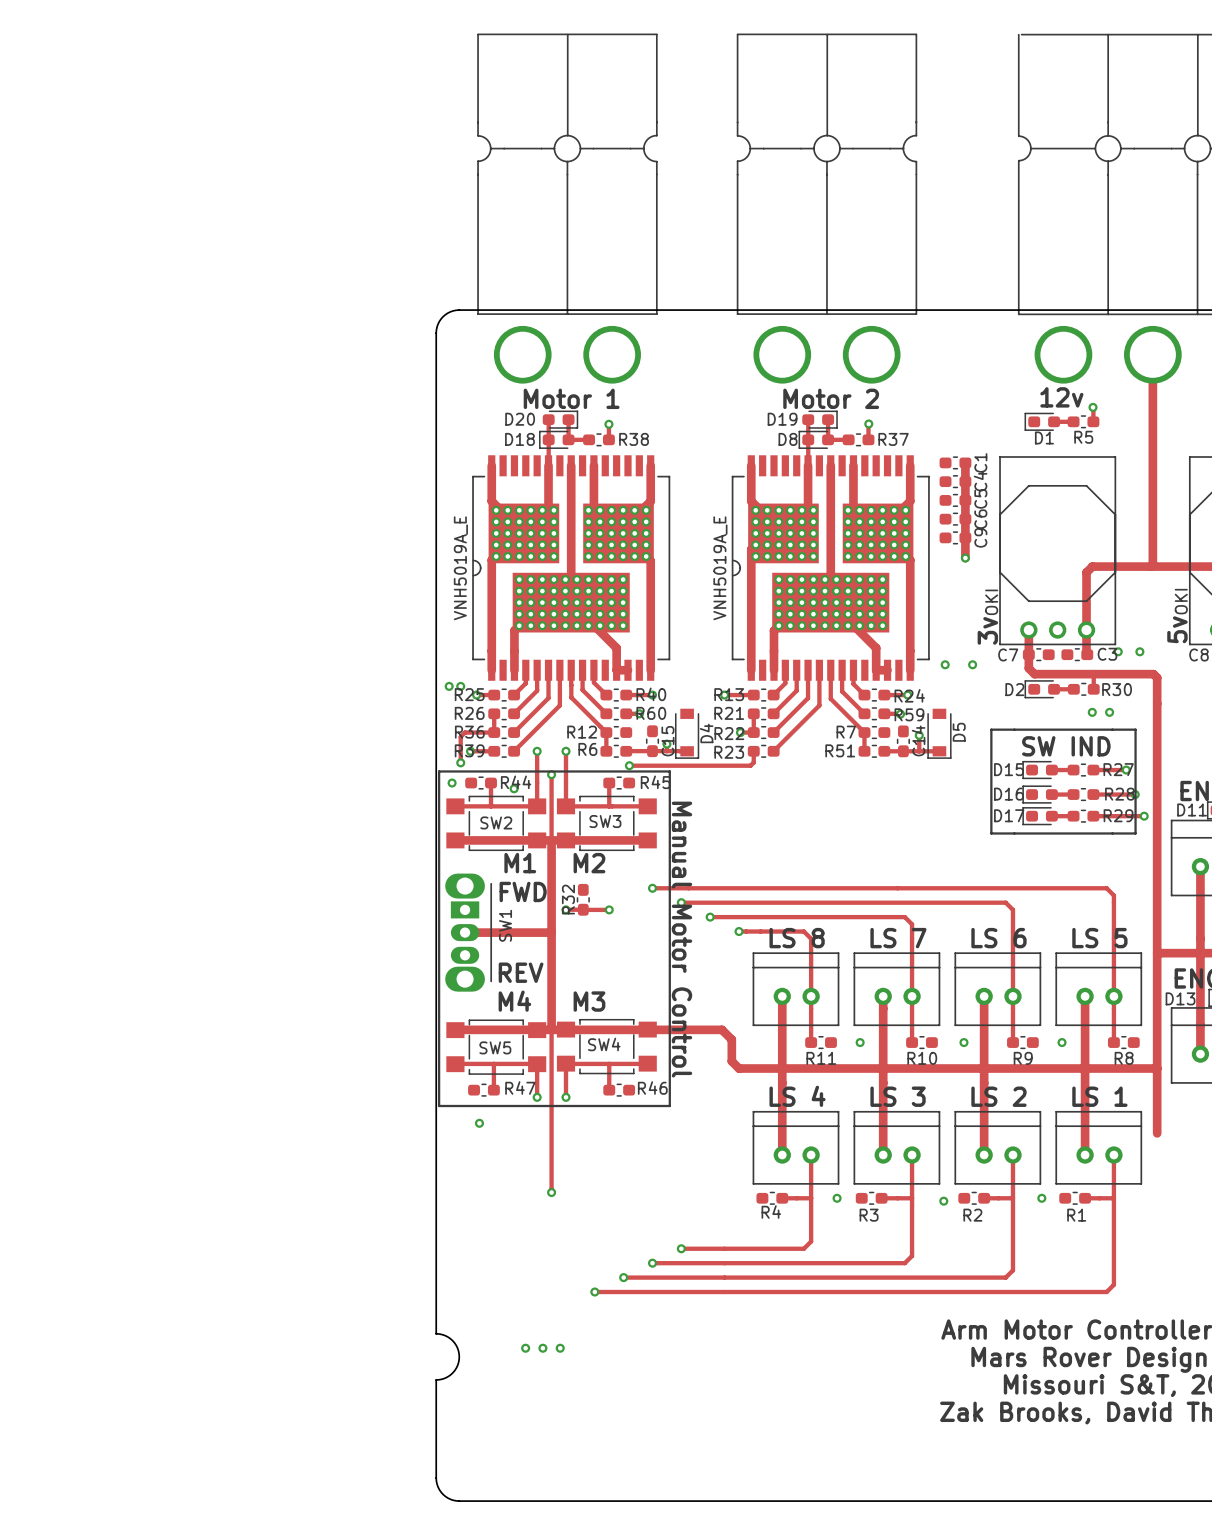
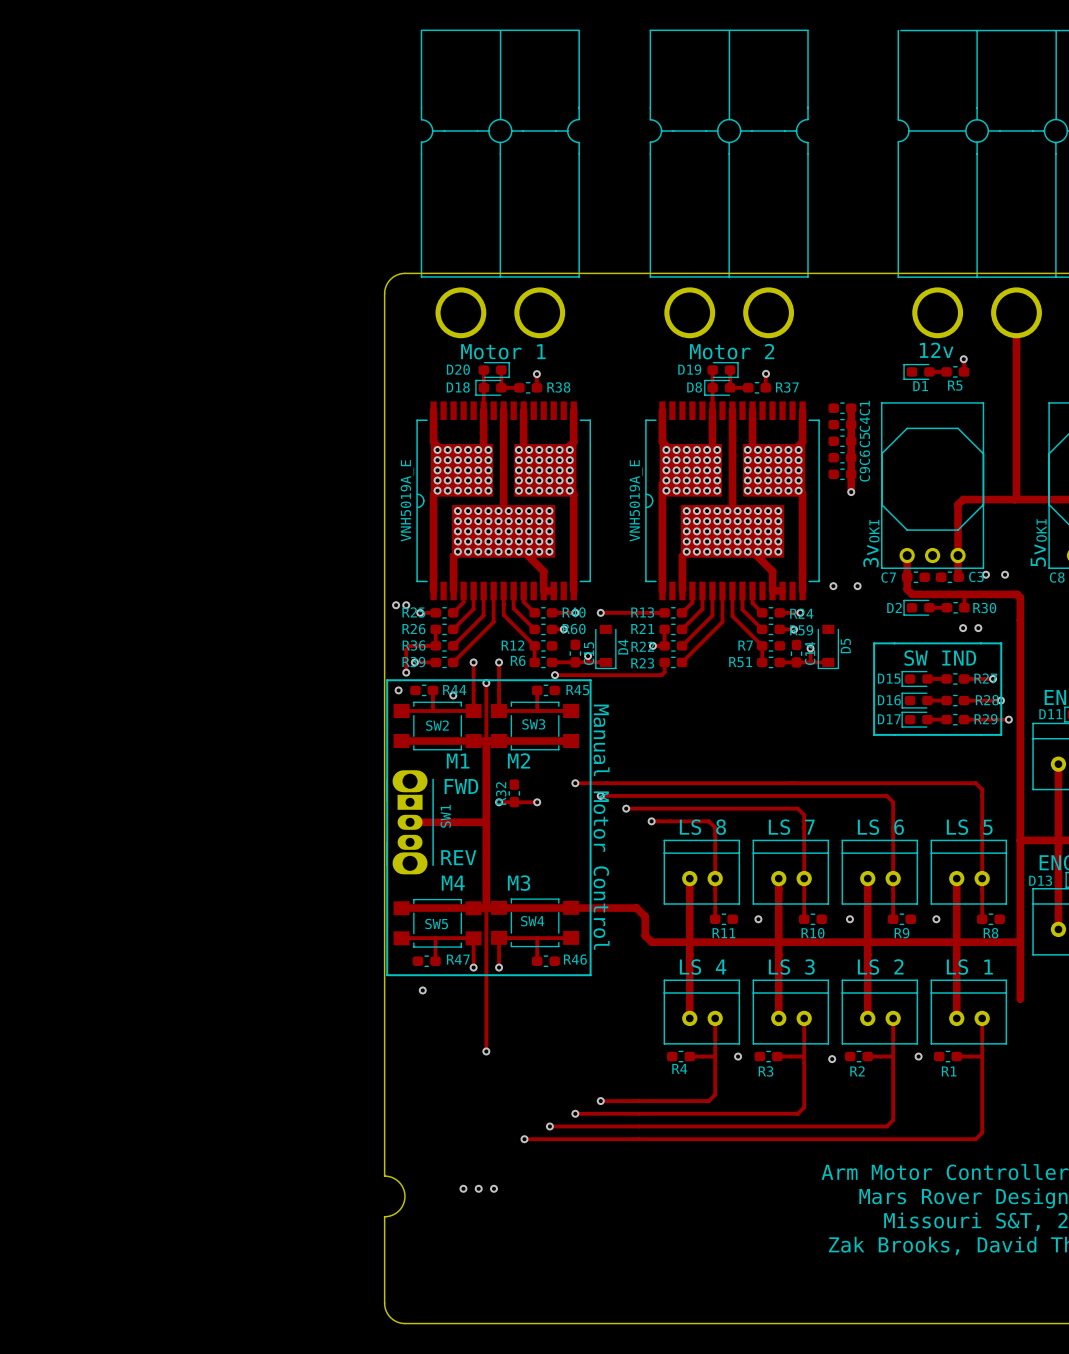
track: none -> (600, 612) (638, 612)
via position: (724, 695) -> (600, 612)

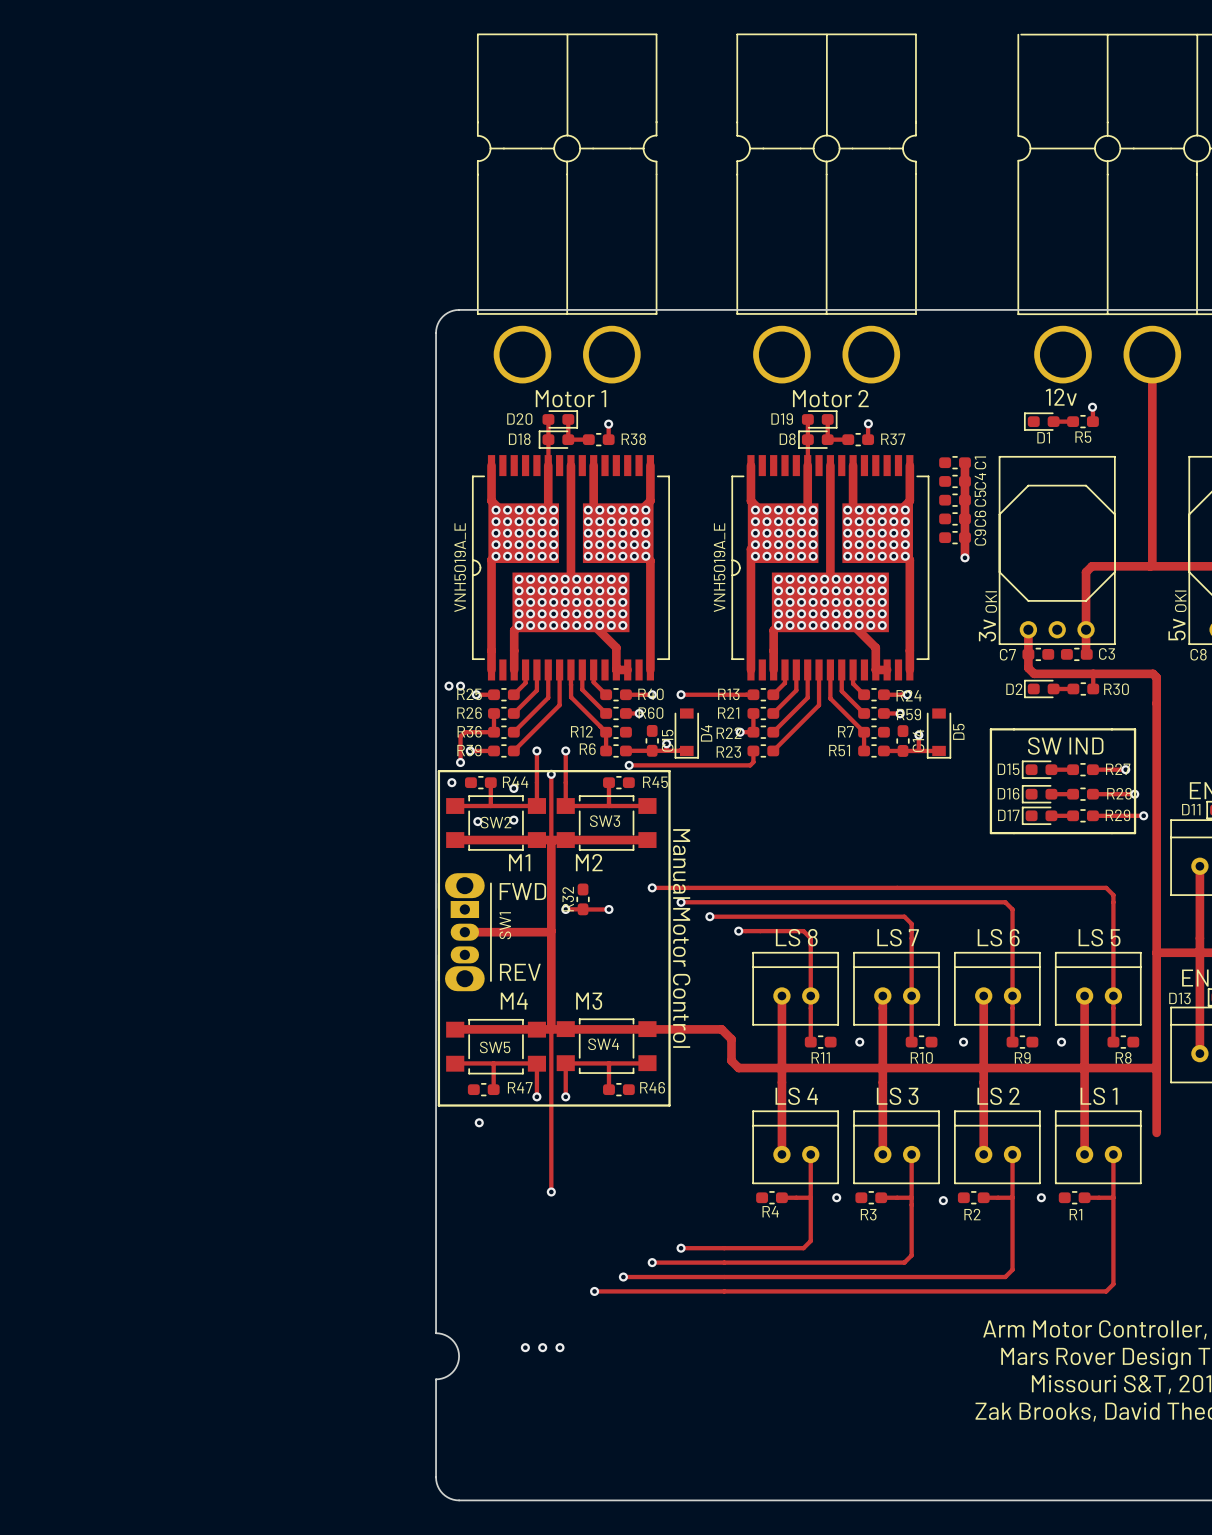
via: (985, 574) -> none
via: (1005, 574) -> none
via: (833, 586) -> none
via: (857, 586) -> none
via: (963, 628) -> none
via: (978, 628) -> none
via: none -> (513, 820)
via: none -> (477, 821)

